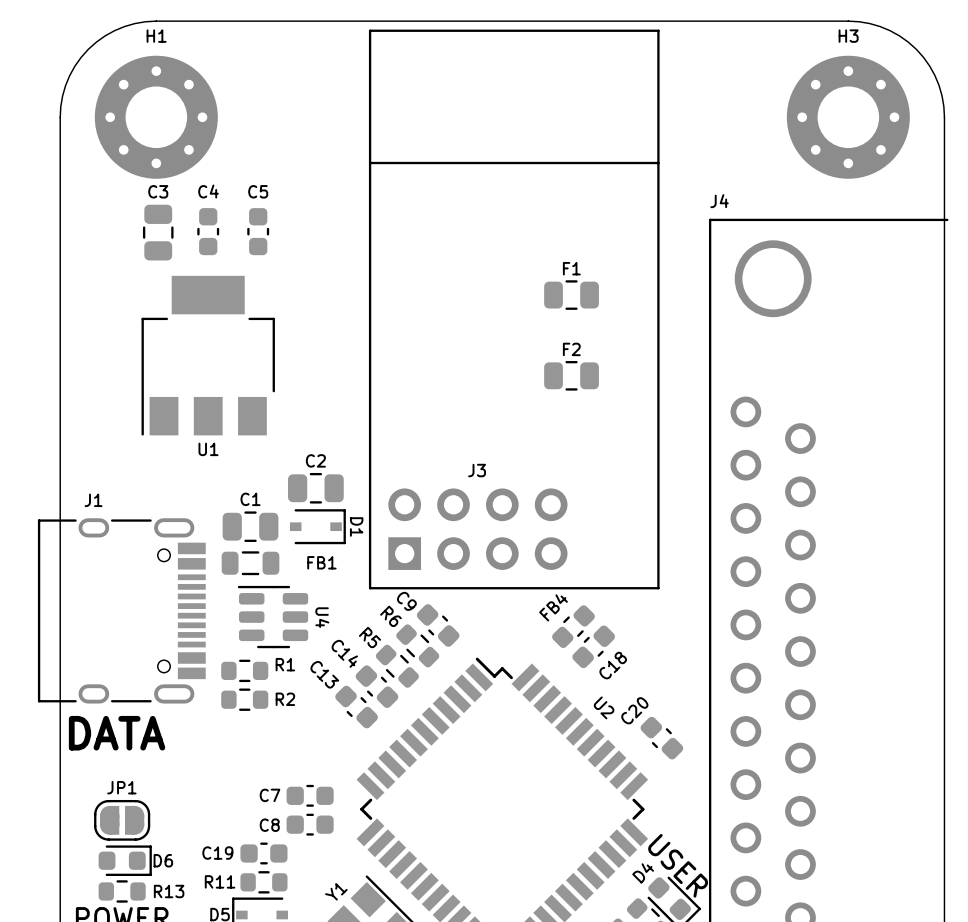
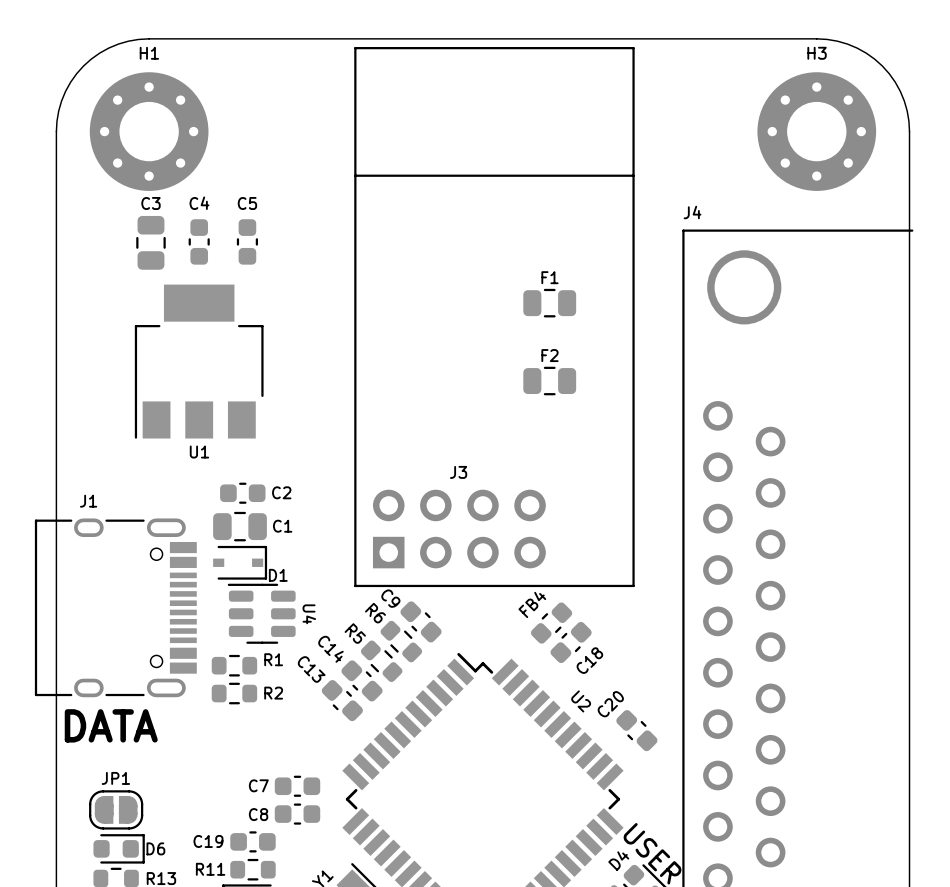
C2 name position: C2 (315, 460) -> C2 (281, 492)
C2 footprint: [288, 472, 344, 504] -> [220, 482, 266, 504]
C1 name position: C1 (250, 499) -> C1 (282, 526)
D1 position: (317, 526) -> (240, 562)
D1 name rotation: 0° (356, 526) -> 90° counterclockwise (278, 575)
FB1: (250, 563) -> none

